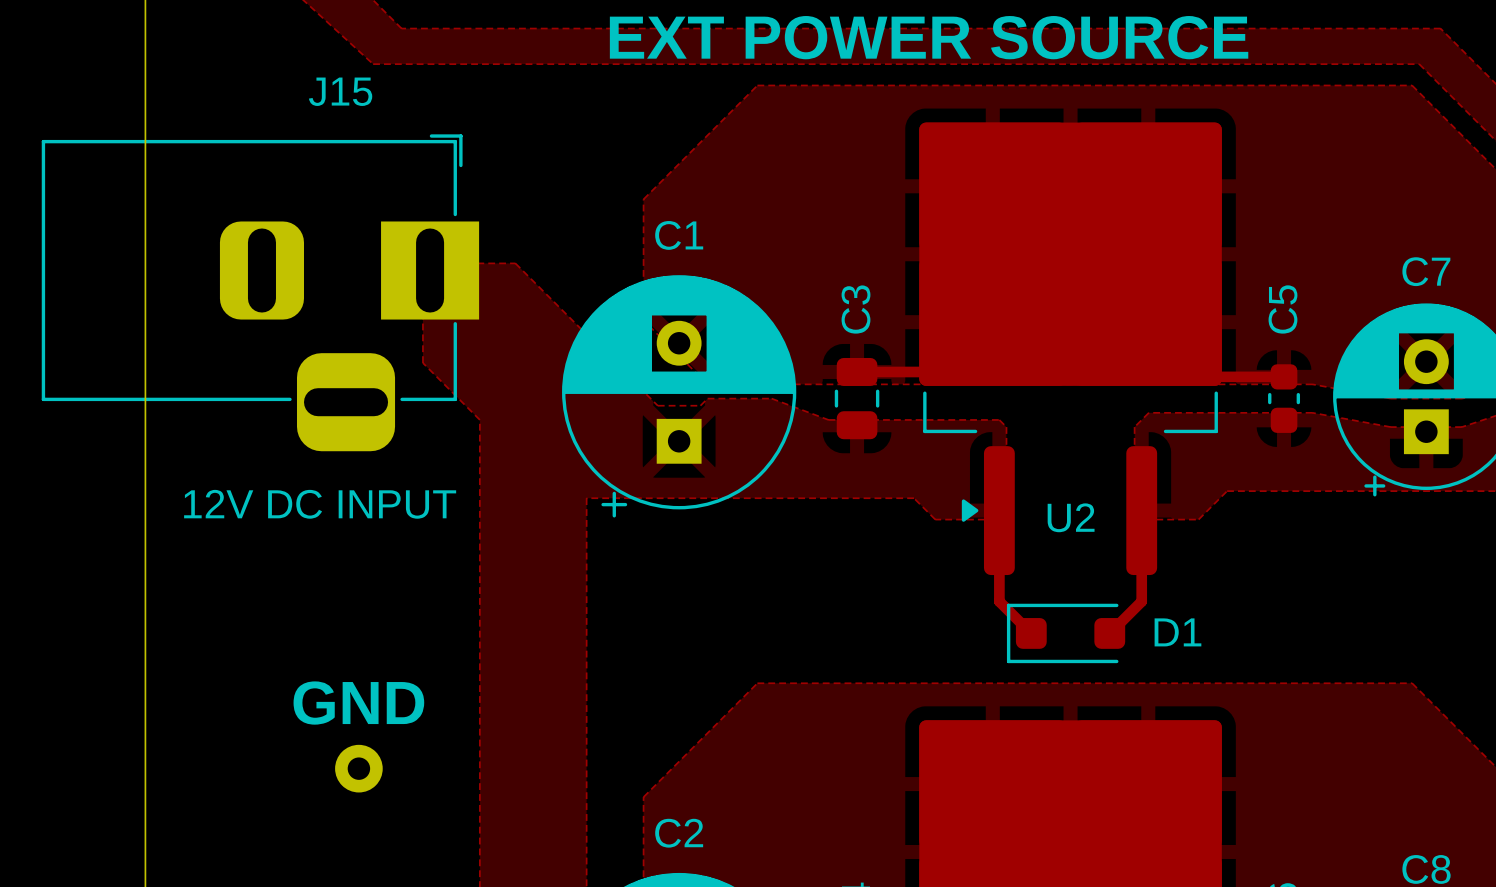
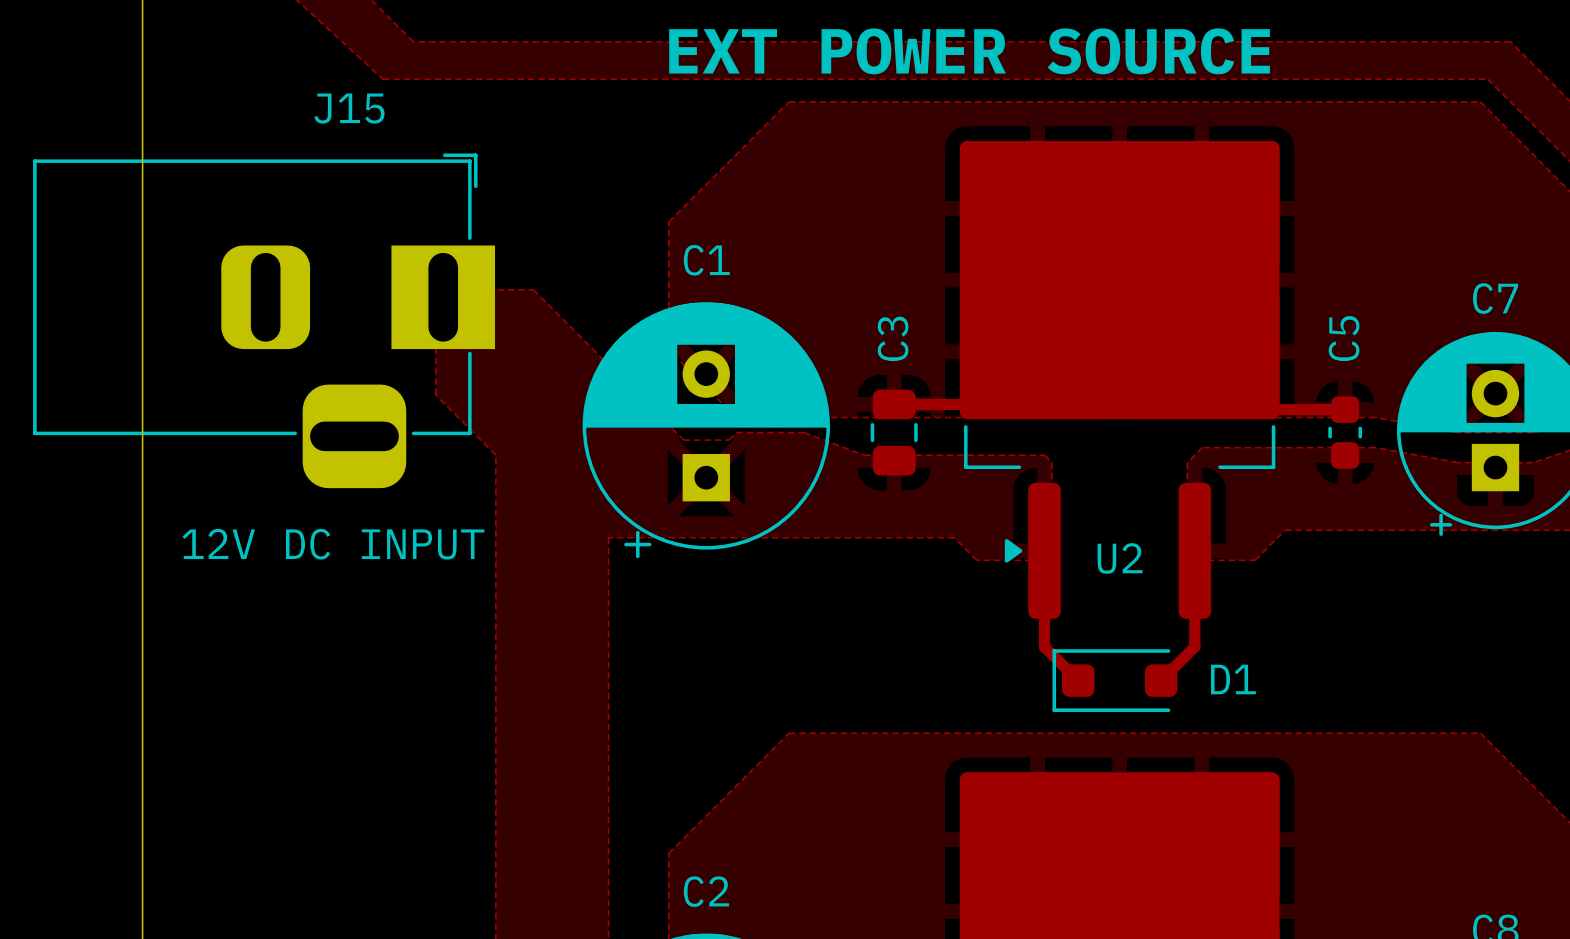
text: GND (358, 703) -> none
part: (358, 768) -> none

